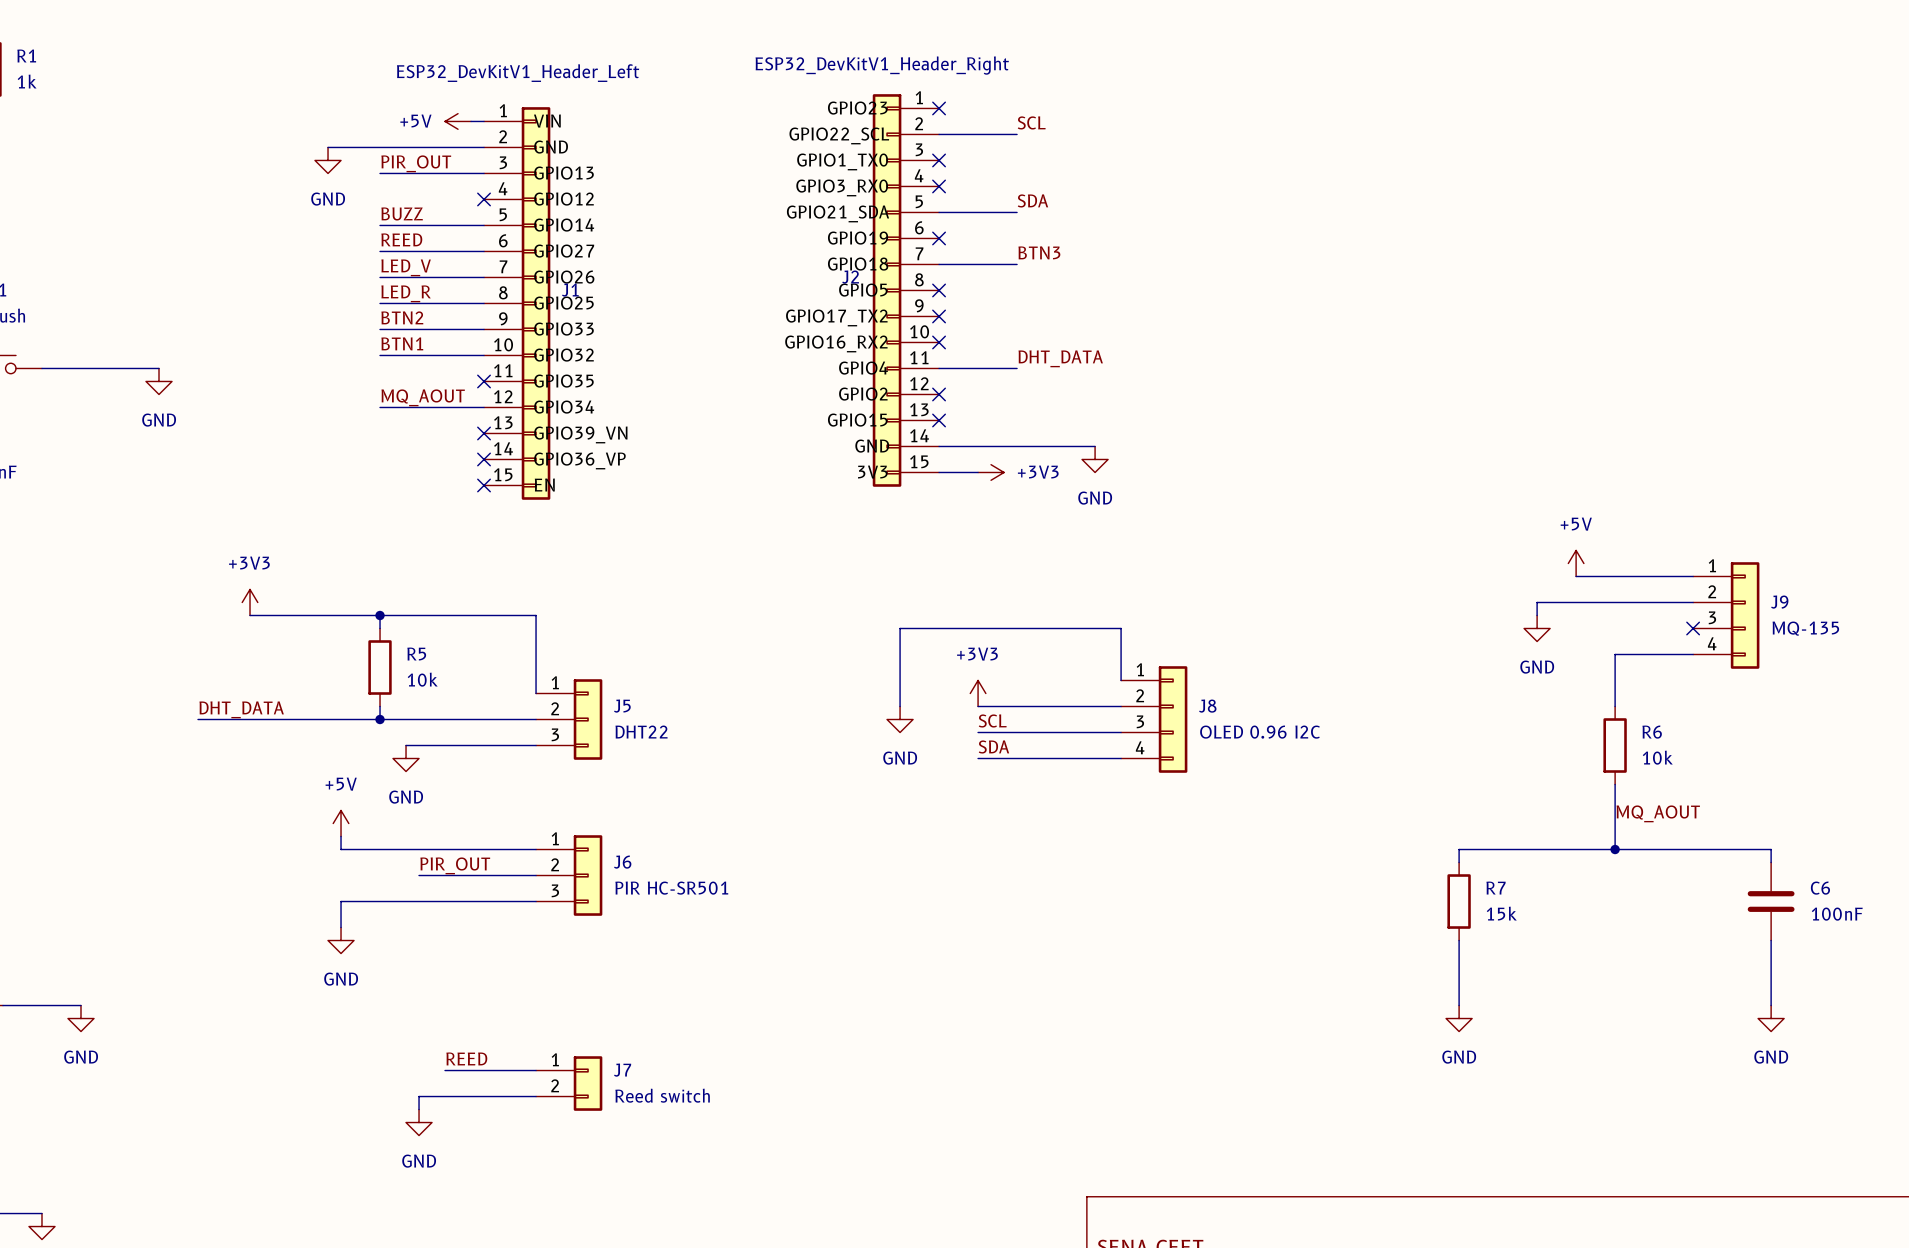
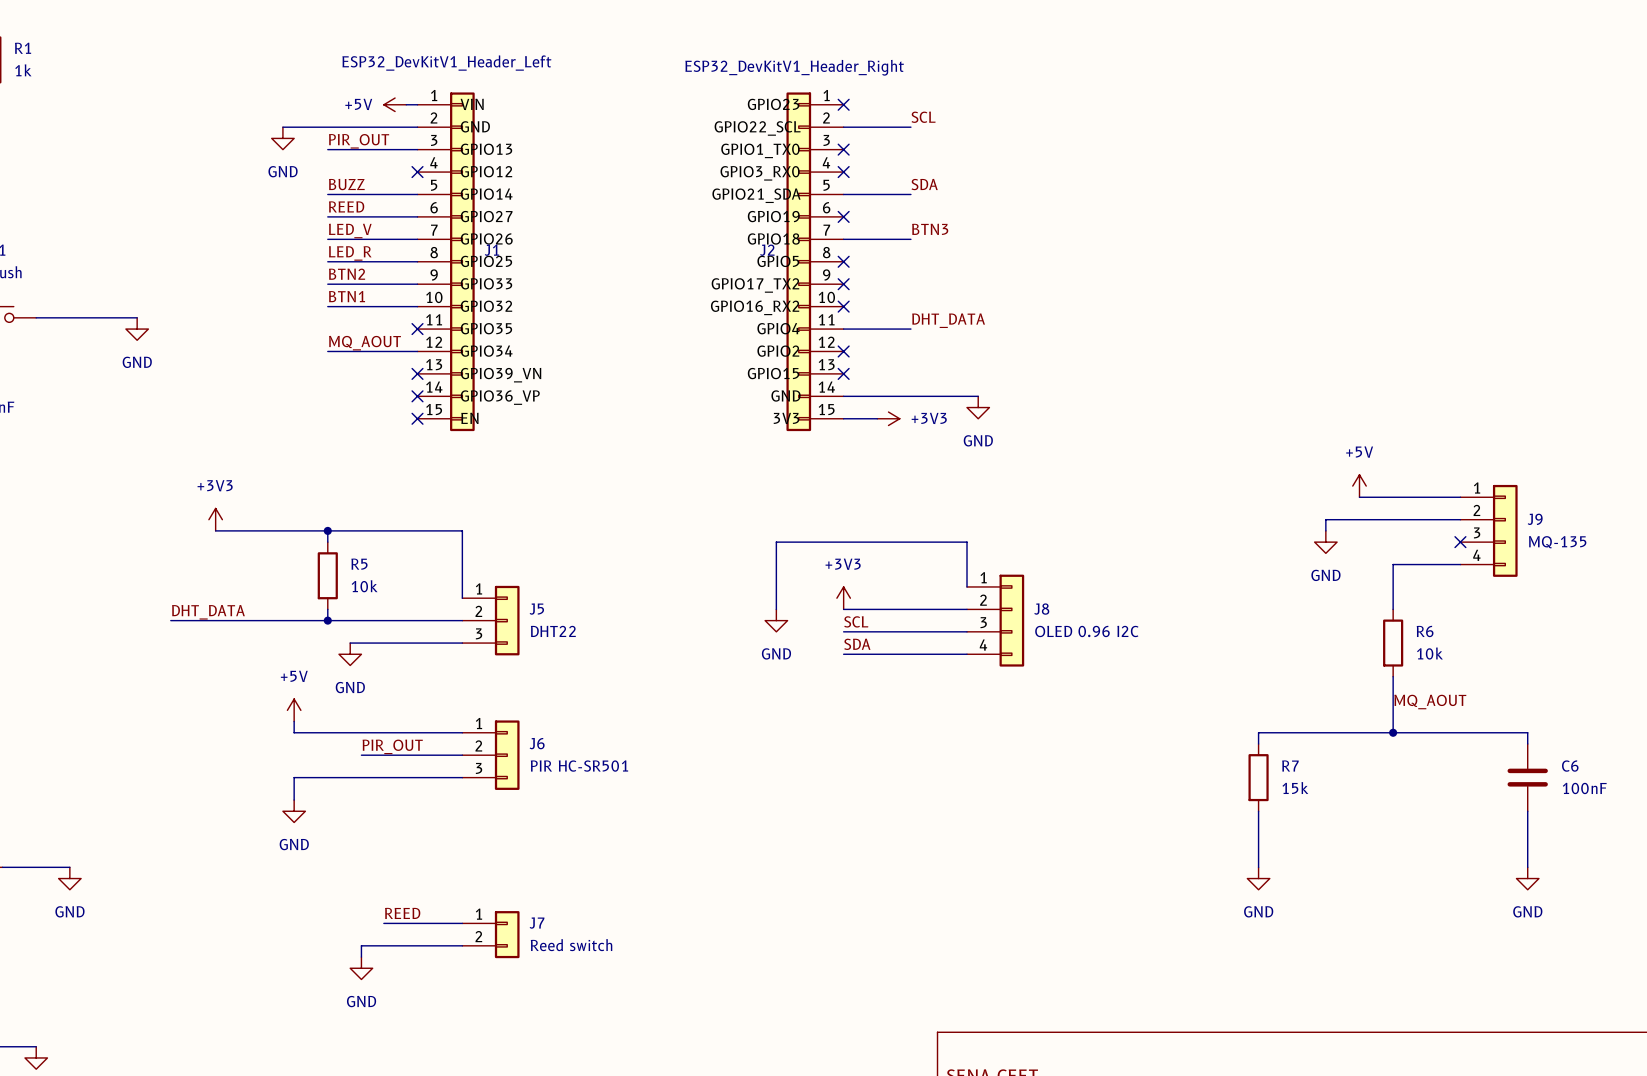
no-connect mark: (939, 108) -> none
no-connect mark: none -> (843, 104)
label position: SCL (1031, 122) -> SCL (923, 117)
wire: (939, 134) (1017, 134) -> (843, 127) (910, 127)
no-connect mark: (939, 160) -> none
no-connect mark: none -> (843, 149)
no-connect mark: (939, 186) -> none
no-connect mark: none -> (843, 172)
label position: SDA (1032, 200) -> SDA (924, 184)
wire: (939, 212) (1017, 212) -> (843, 194) (910, 194)
no-connect mark: (939, 238) -> none
no-connect mark: none -> (843, 216)
label position: BTN3 (1039, 252) -> BTN3 (930, 229)
wire: (939, 264) (1017, 264) -> (843, 239) (910, 239)
J2 position: (905, 290) -> (815, 261)
no-connect mark: (939, 290) -> none
no-connect mark: none -> (843, 261)
no-connect mark: (939, 316) -> none
no-connect mark: none -> (843, 284)
no-connect mark: (939, 342) -> none
no-connect mark: none -> (843, 306)
label position: DHT_DATA (1060, 358) -> DHT_DATA (948, 320)
wire: (939, 368) (1017, 368) -> (843, 329) (910, 329)
no-connect mark: (939, 394) -> none
no-connect mark: none -> (843, 351)
no-connect mark: (939, 420) -> none
no-connect mark: none -> (843, 373)
wire: (939, 446) (1095, 446) -> (843, 396) (978, 396)
power symbol position: GND (1095, 459) -> GND (978, 407)
wire: (939, 472) (978, 472) -> (843, 418) (877, 418)
power symbol position: +3V3 (991, 472) -> +3V3 (888, 418)

